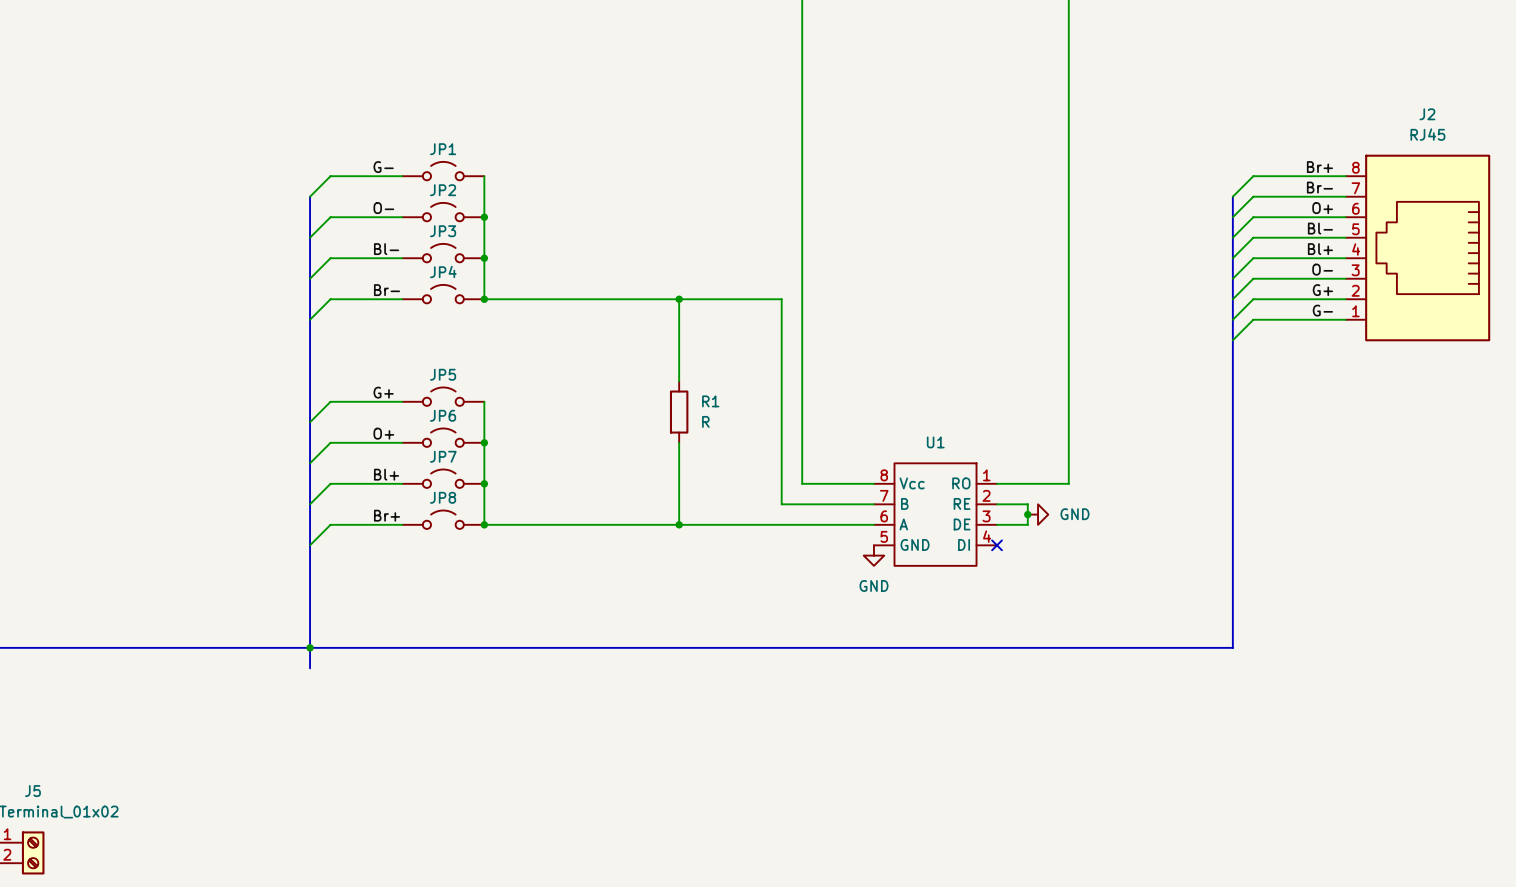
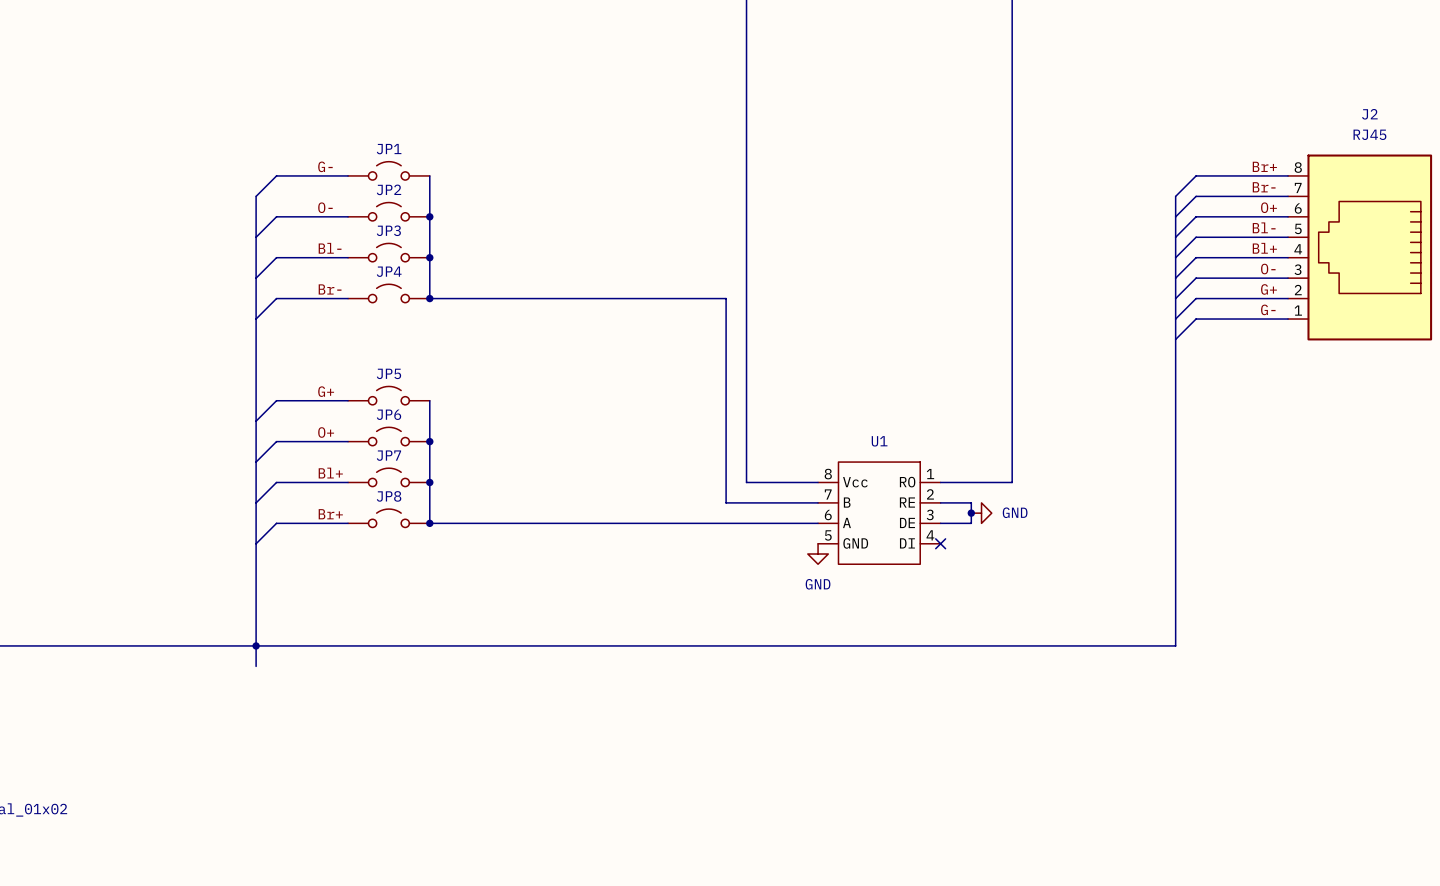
wire: (679, 299) (679, 381) -> none
junction: (679, 299) -> none
R1: R (679, 412) -> none
wire: (679, 442) (679, 524) -> none
junction: (679, 524) -> none

